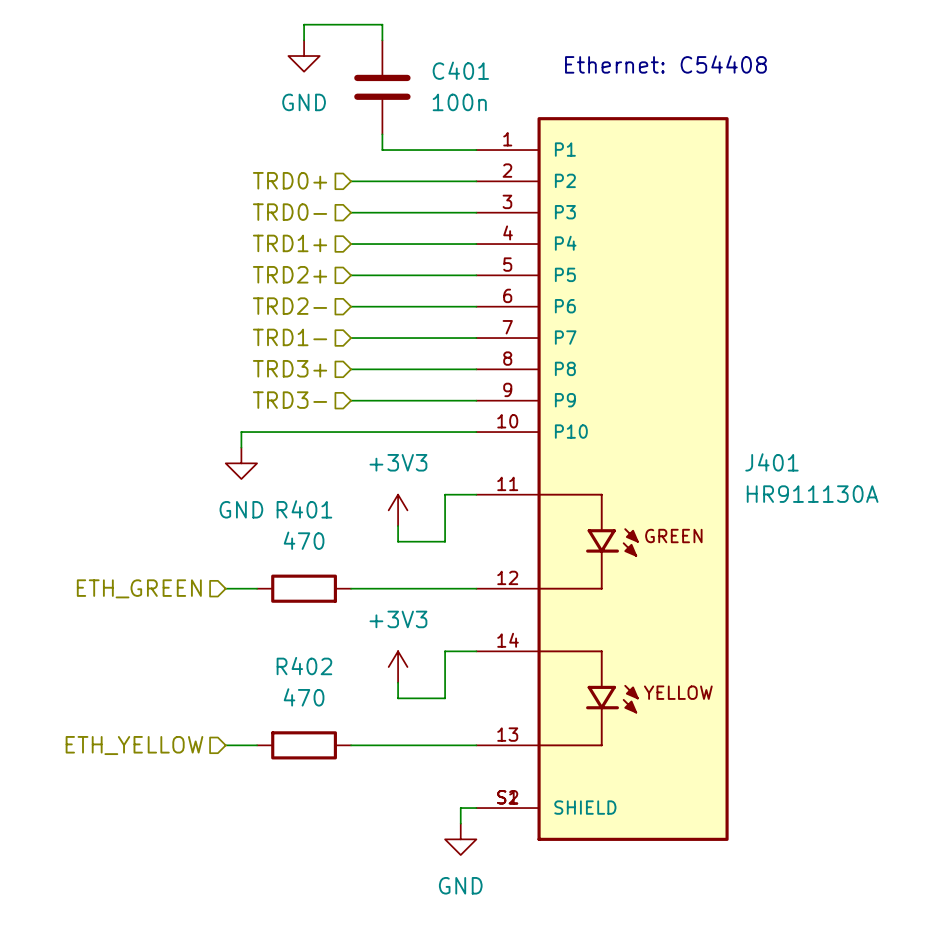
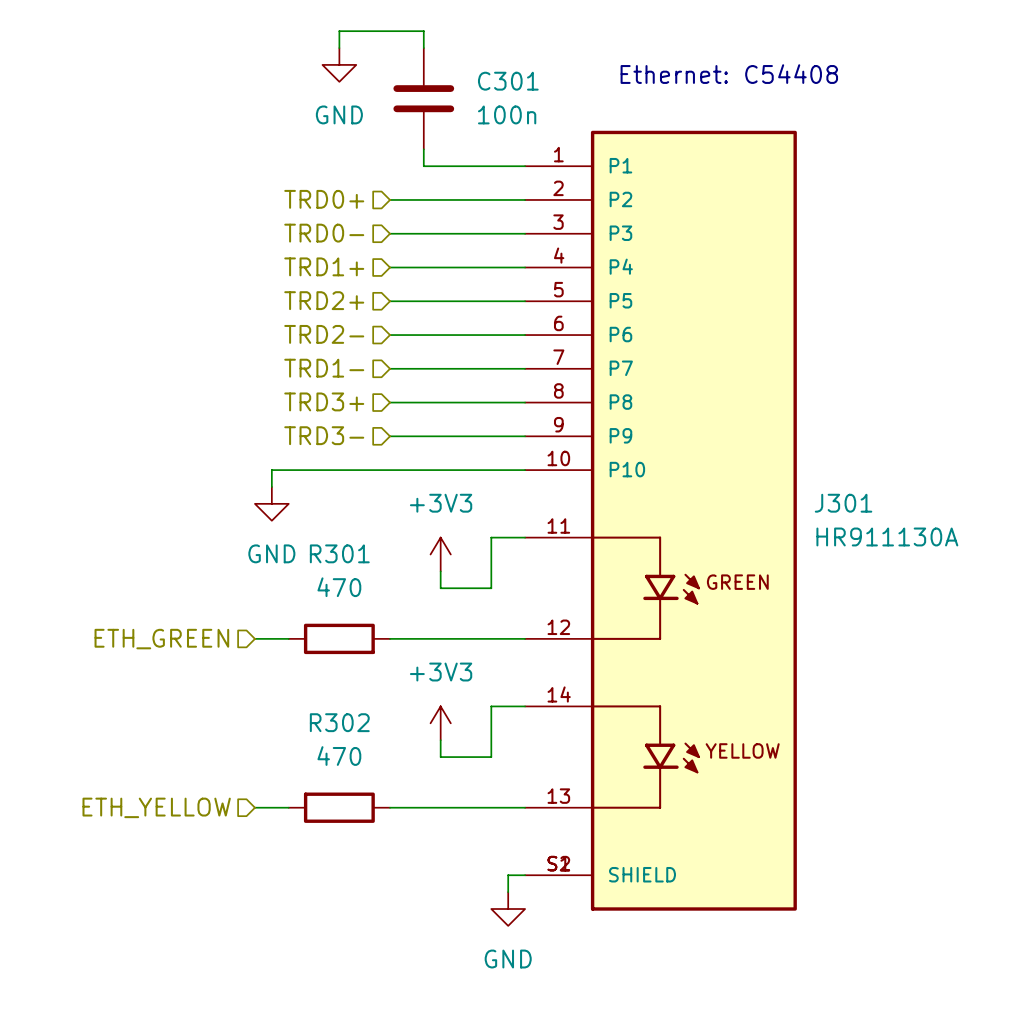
C401 name: C401 (460, 70) -> C301 (508, 81)
J401 name: J401 (771, 462) -> J301 (843, 503)
R401 name: R401 (304, 509) -> R301 (339, 553)
R402 name: R402 (304, 666) -> R302 (339, 722)

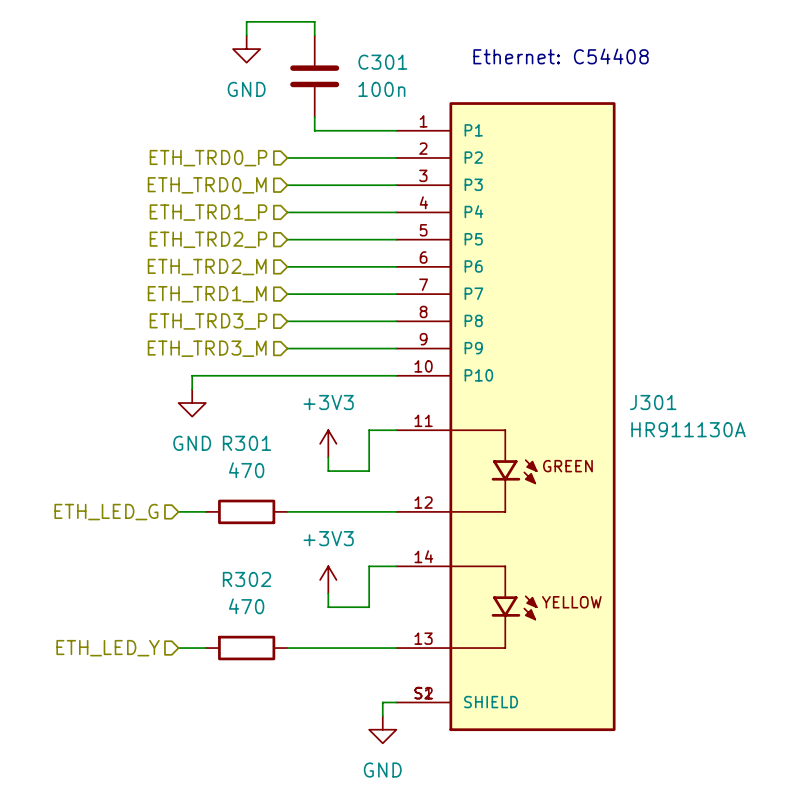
hierarchical label: TRD0+ (324, 199) -> ETH_TRD0_P (208, 158)
hierarchical label: TRD0- (324, 233) -> ETH_TRD0_M (207, 185)
hierarchical label: TRD1+ (324, 266) -> ETH_TRD1_P (208, 212)
hierarchical label: TRD2+ (324, 300) -> ETH_TRD2_P (208, 239)
hierarchical label: TRD2- (324, 334) -> ETH_TRD2_M (207, 267)
hierarchical label: TRD1- (324, 368) -> ETH_TRD1_M (207, 294)
hierarchical label: TRD3+ (324, 401) -> ETH_TRD3_P (208, 321)
hierarchical label: TRD3- (324, 435) -> ETH_TRD3_M (207, 348)
hierarchical label: ETH_GREEN (161, 639) -> ETH_LED_G (106, 512)
hierarchical label: ETH_YELLOW (156, 807) -> ETH_LED_Y (108, 648)

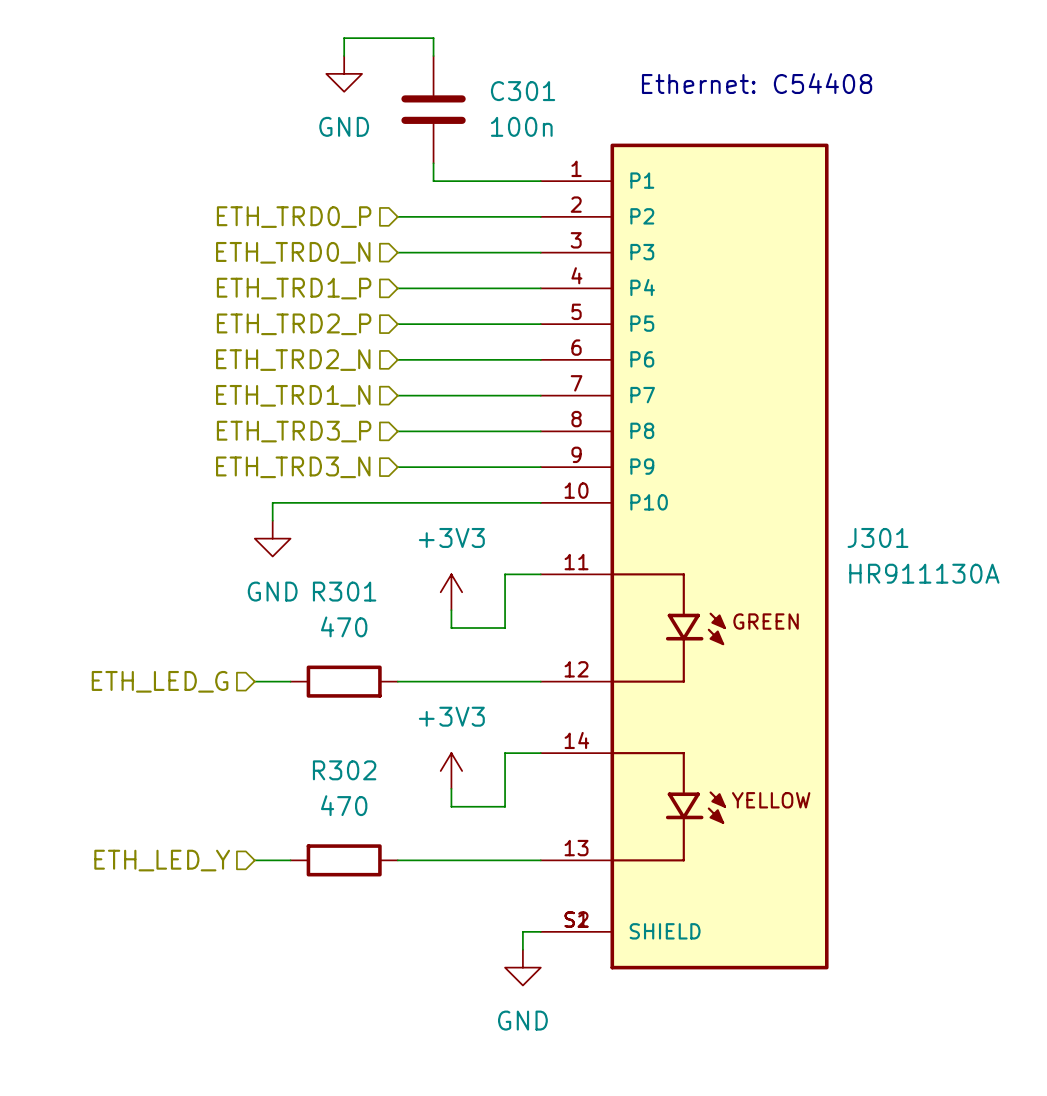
hierarchical label: ETH_TRD0_M (207, 185) -> ETH_TRD0_N (293, 252)
hierarchical label: ETH_TRD2_M (207, 267) -> ETH_TRD2_N (293, 360)
hierarchical label: ETH_TRD1_M (207, 294) -> ETH_TRD1_N (293, 395)
hierarchical label: ETH_TRD3_M (207, 348) -> ETH_TRD3_N (293, 467)

